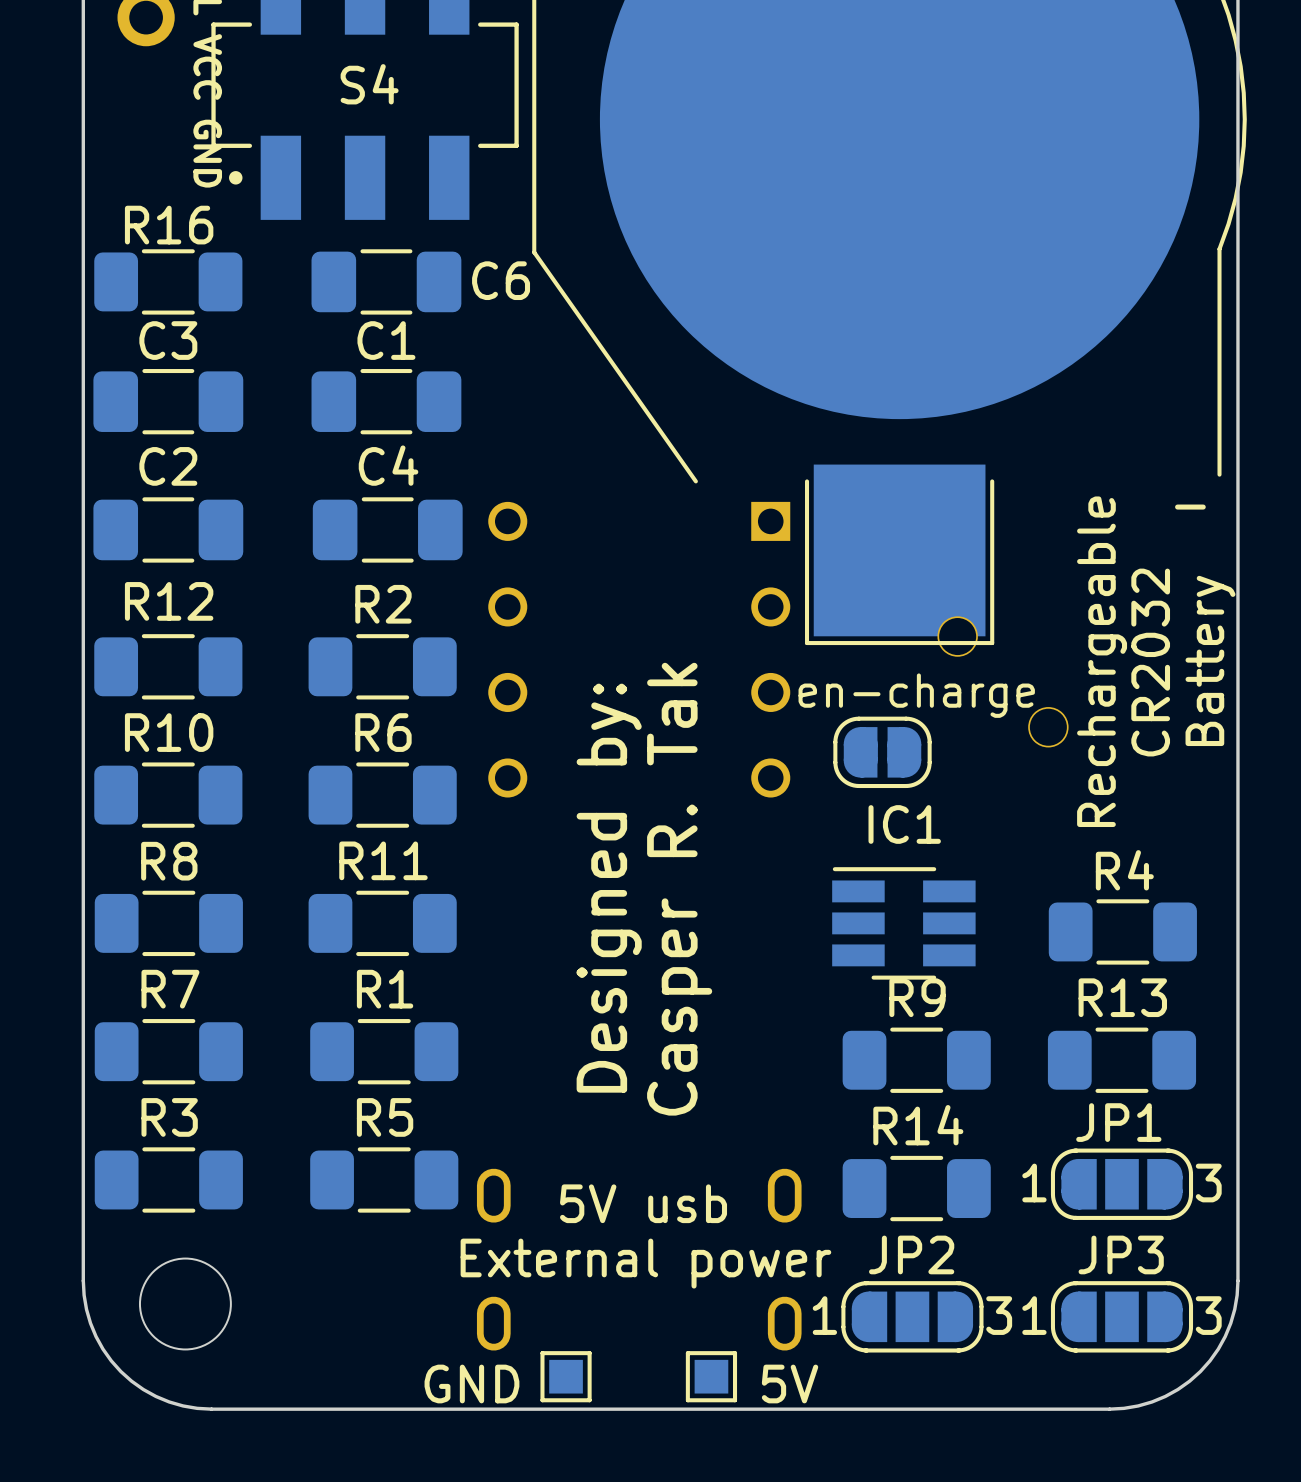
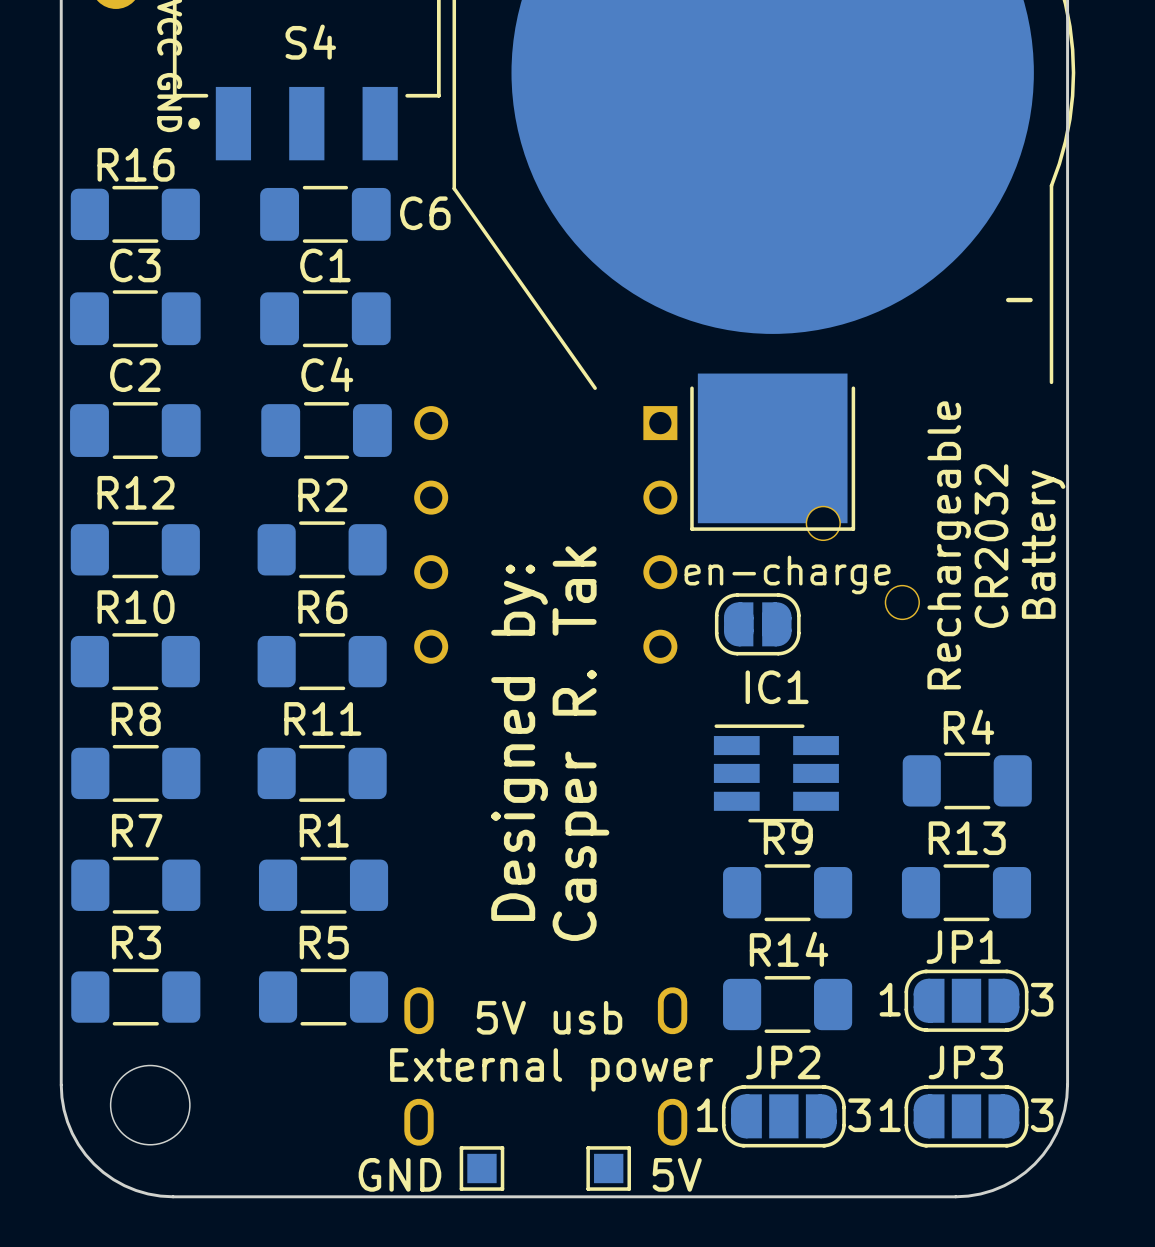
text position: - (1190, 507) -> - (1019, 300)

